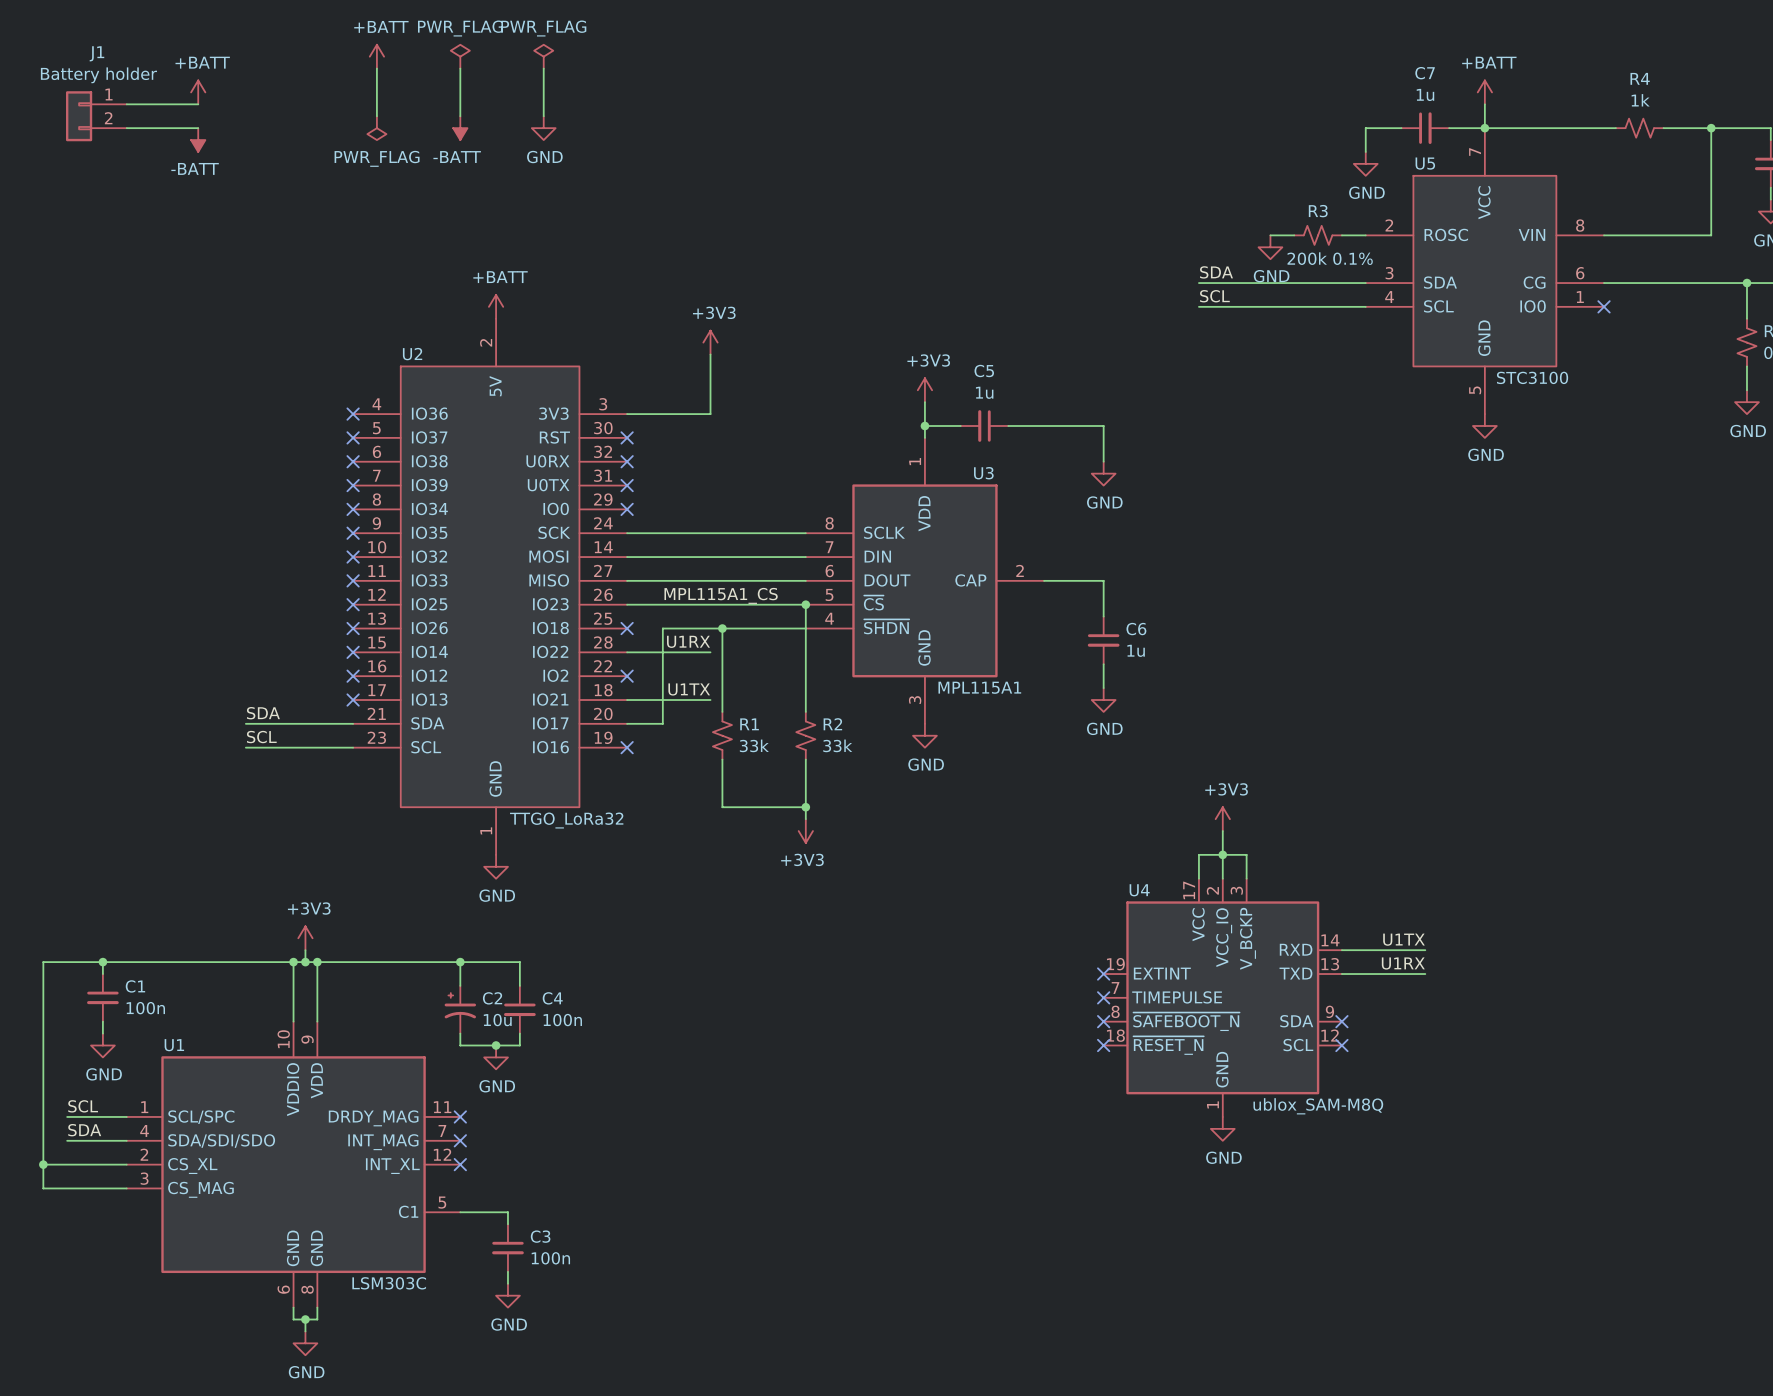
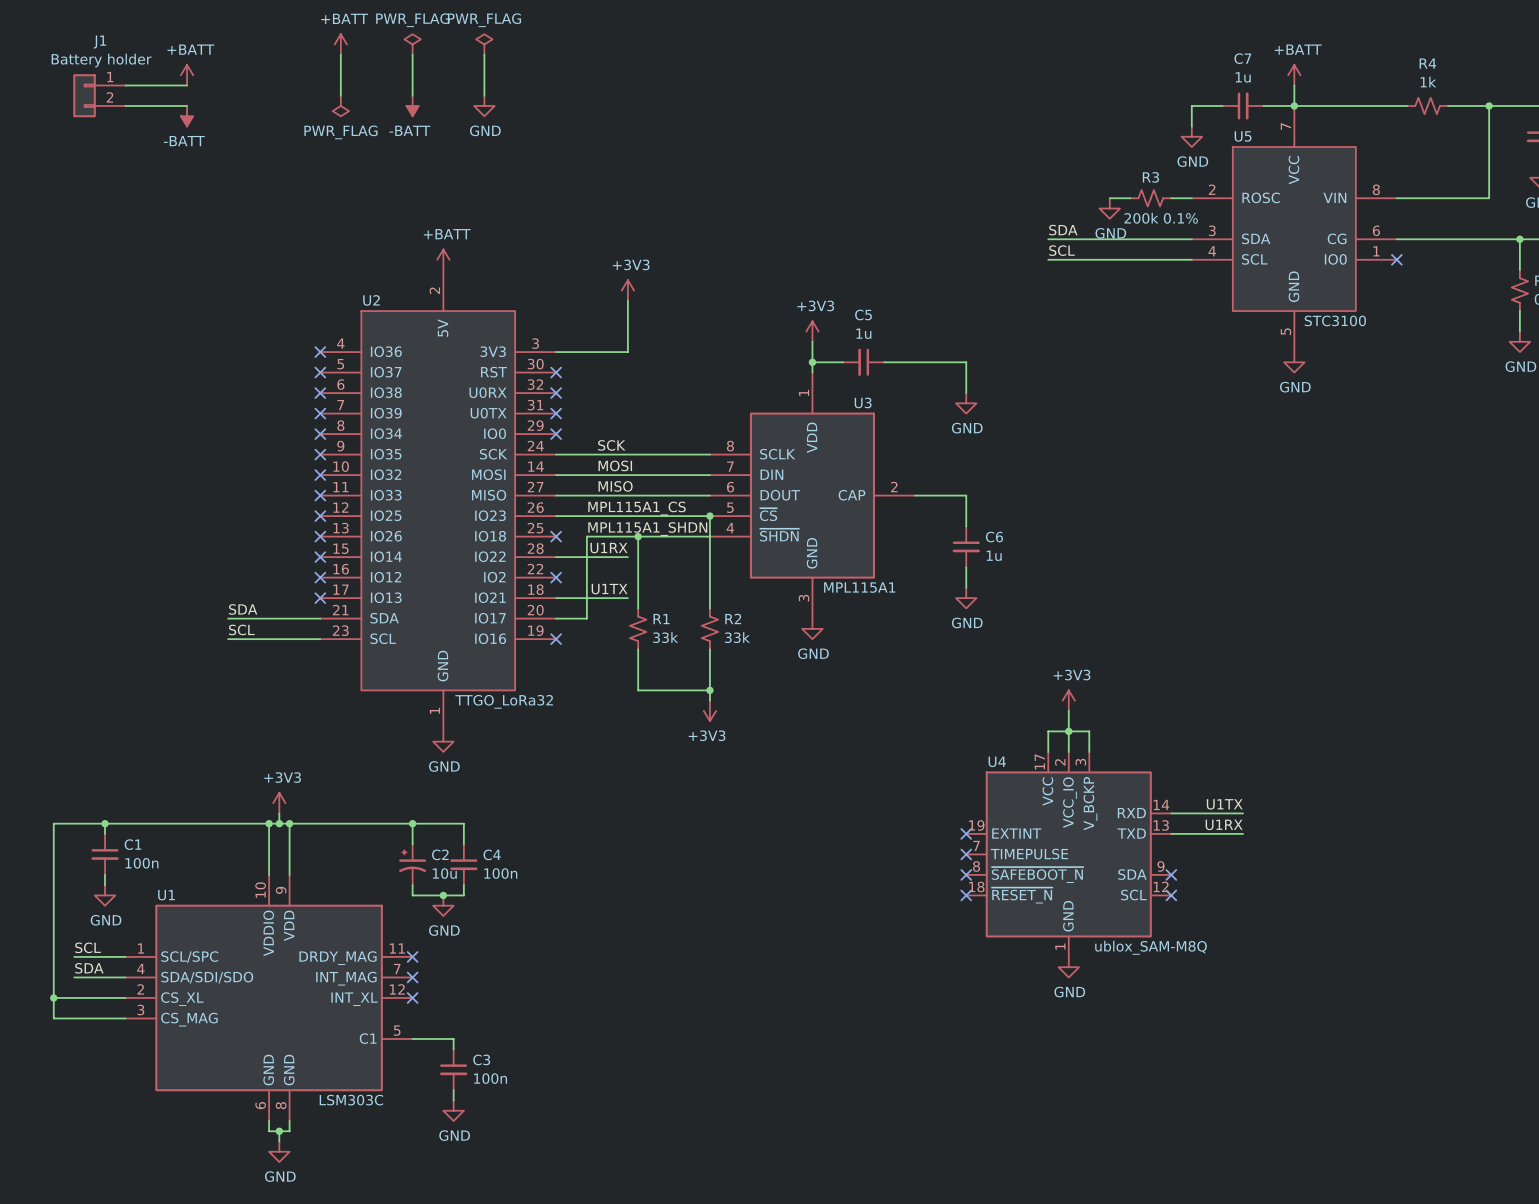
label: none -> SCK (611, 445)
label: none -> MOSI (615, 465)
label: none -> MISO (615, 486)
label: none -> MPL115A1_SHDN (647, 529)

